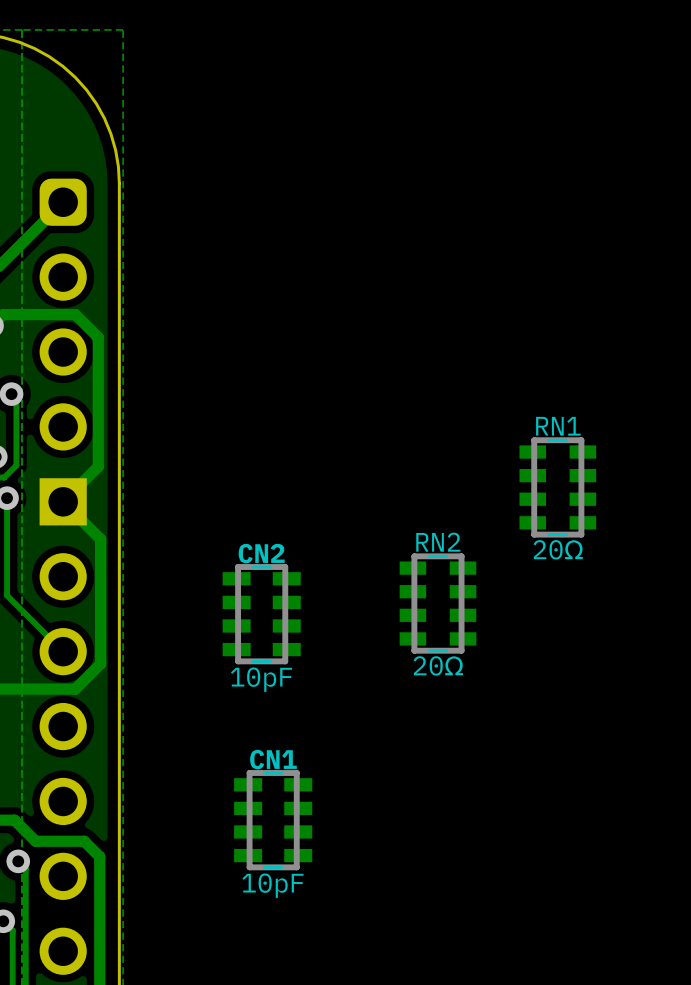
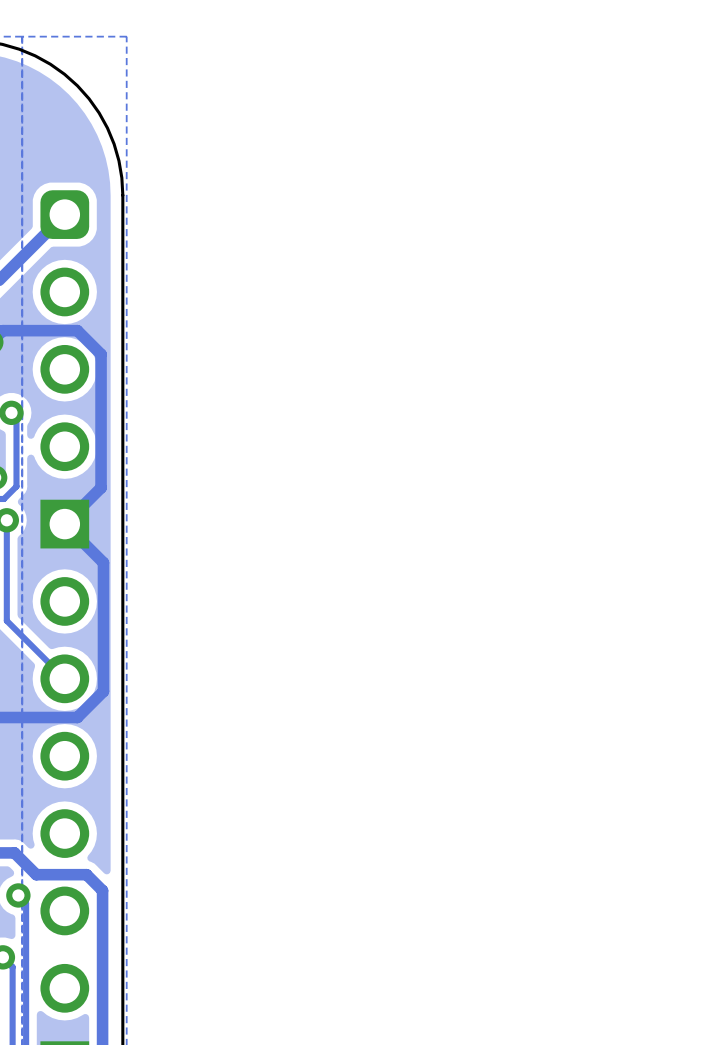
RN1: (557, 487) -> none
RN2: (437, 603) -> none
CN2: (261, 614) -> none
CN1: (273, 820) -> none

